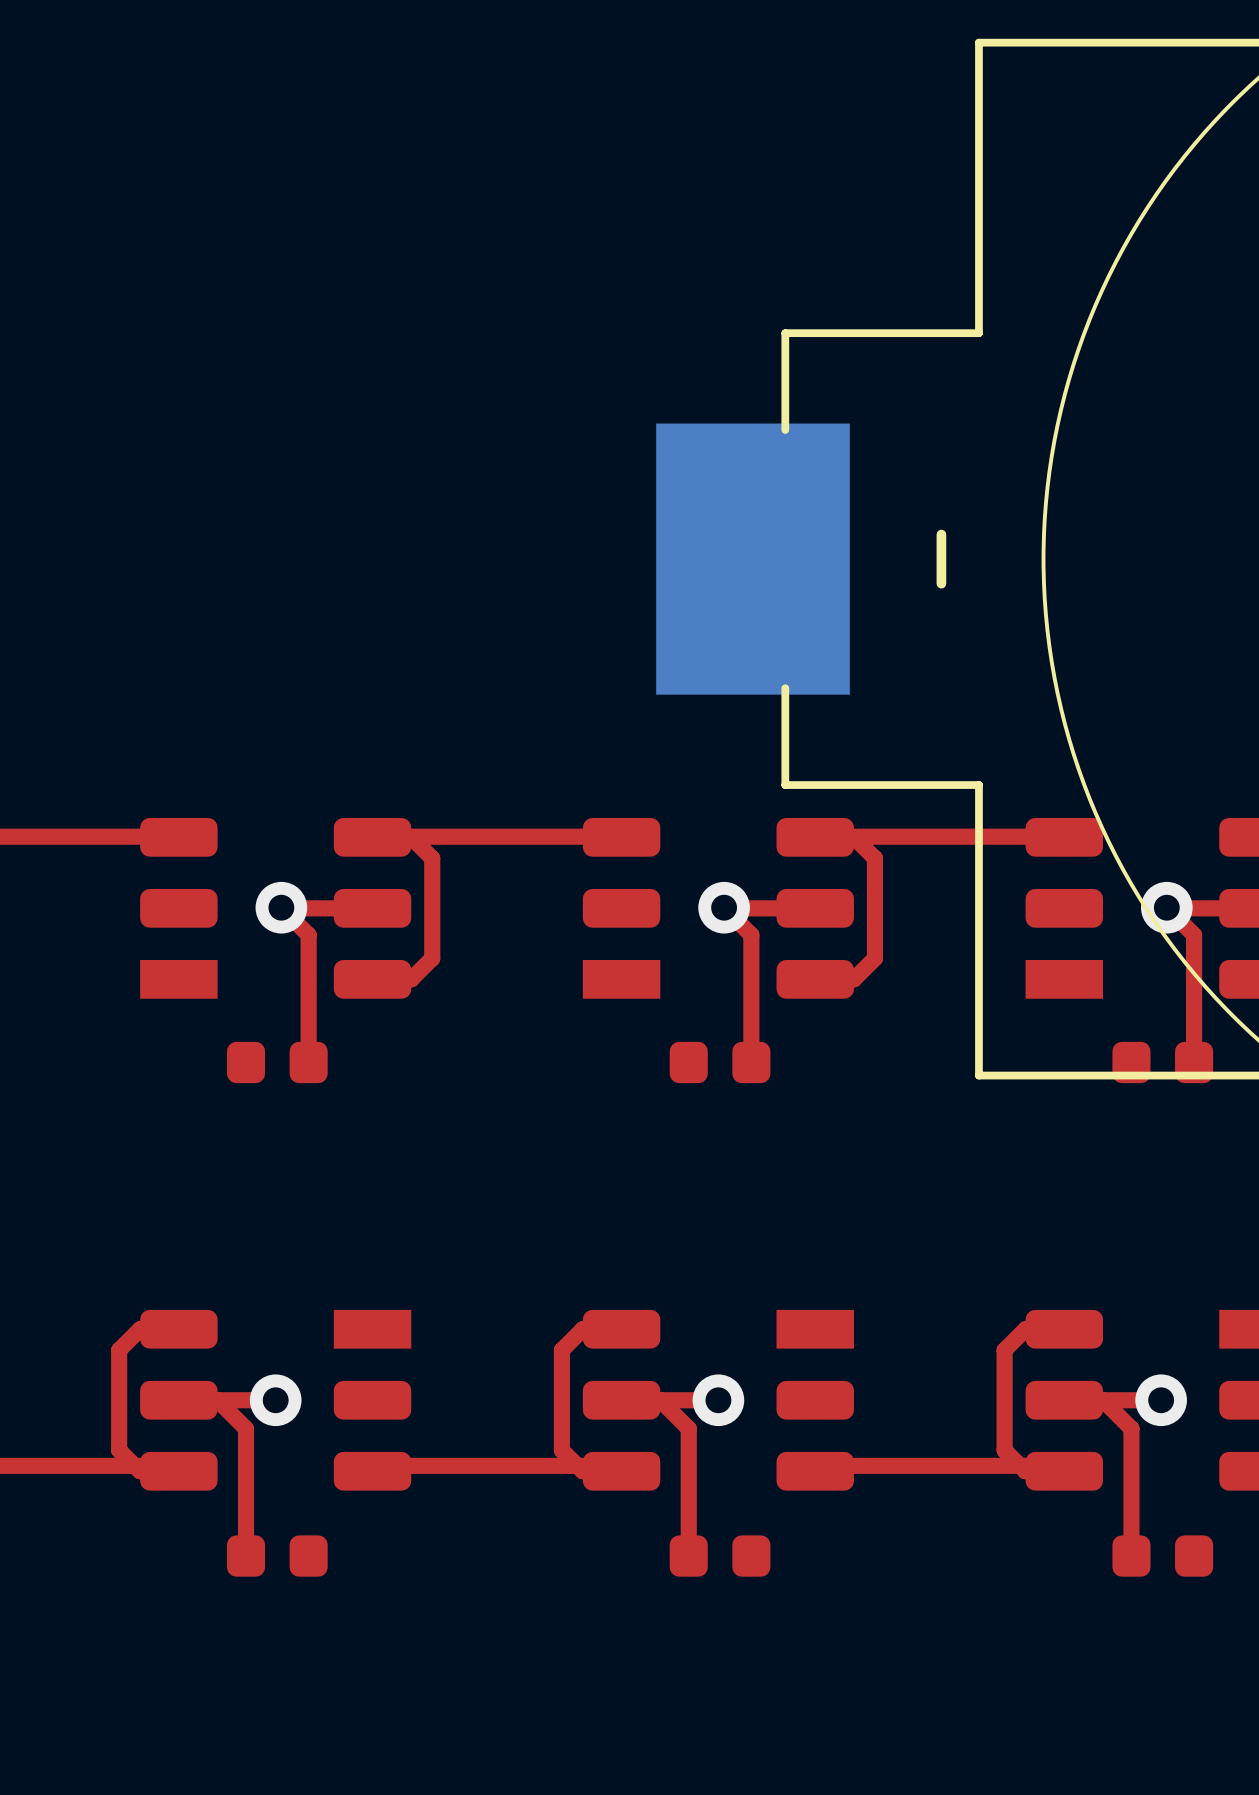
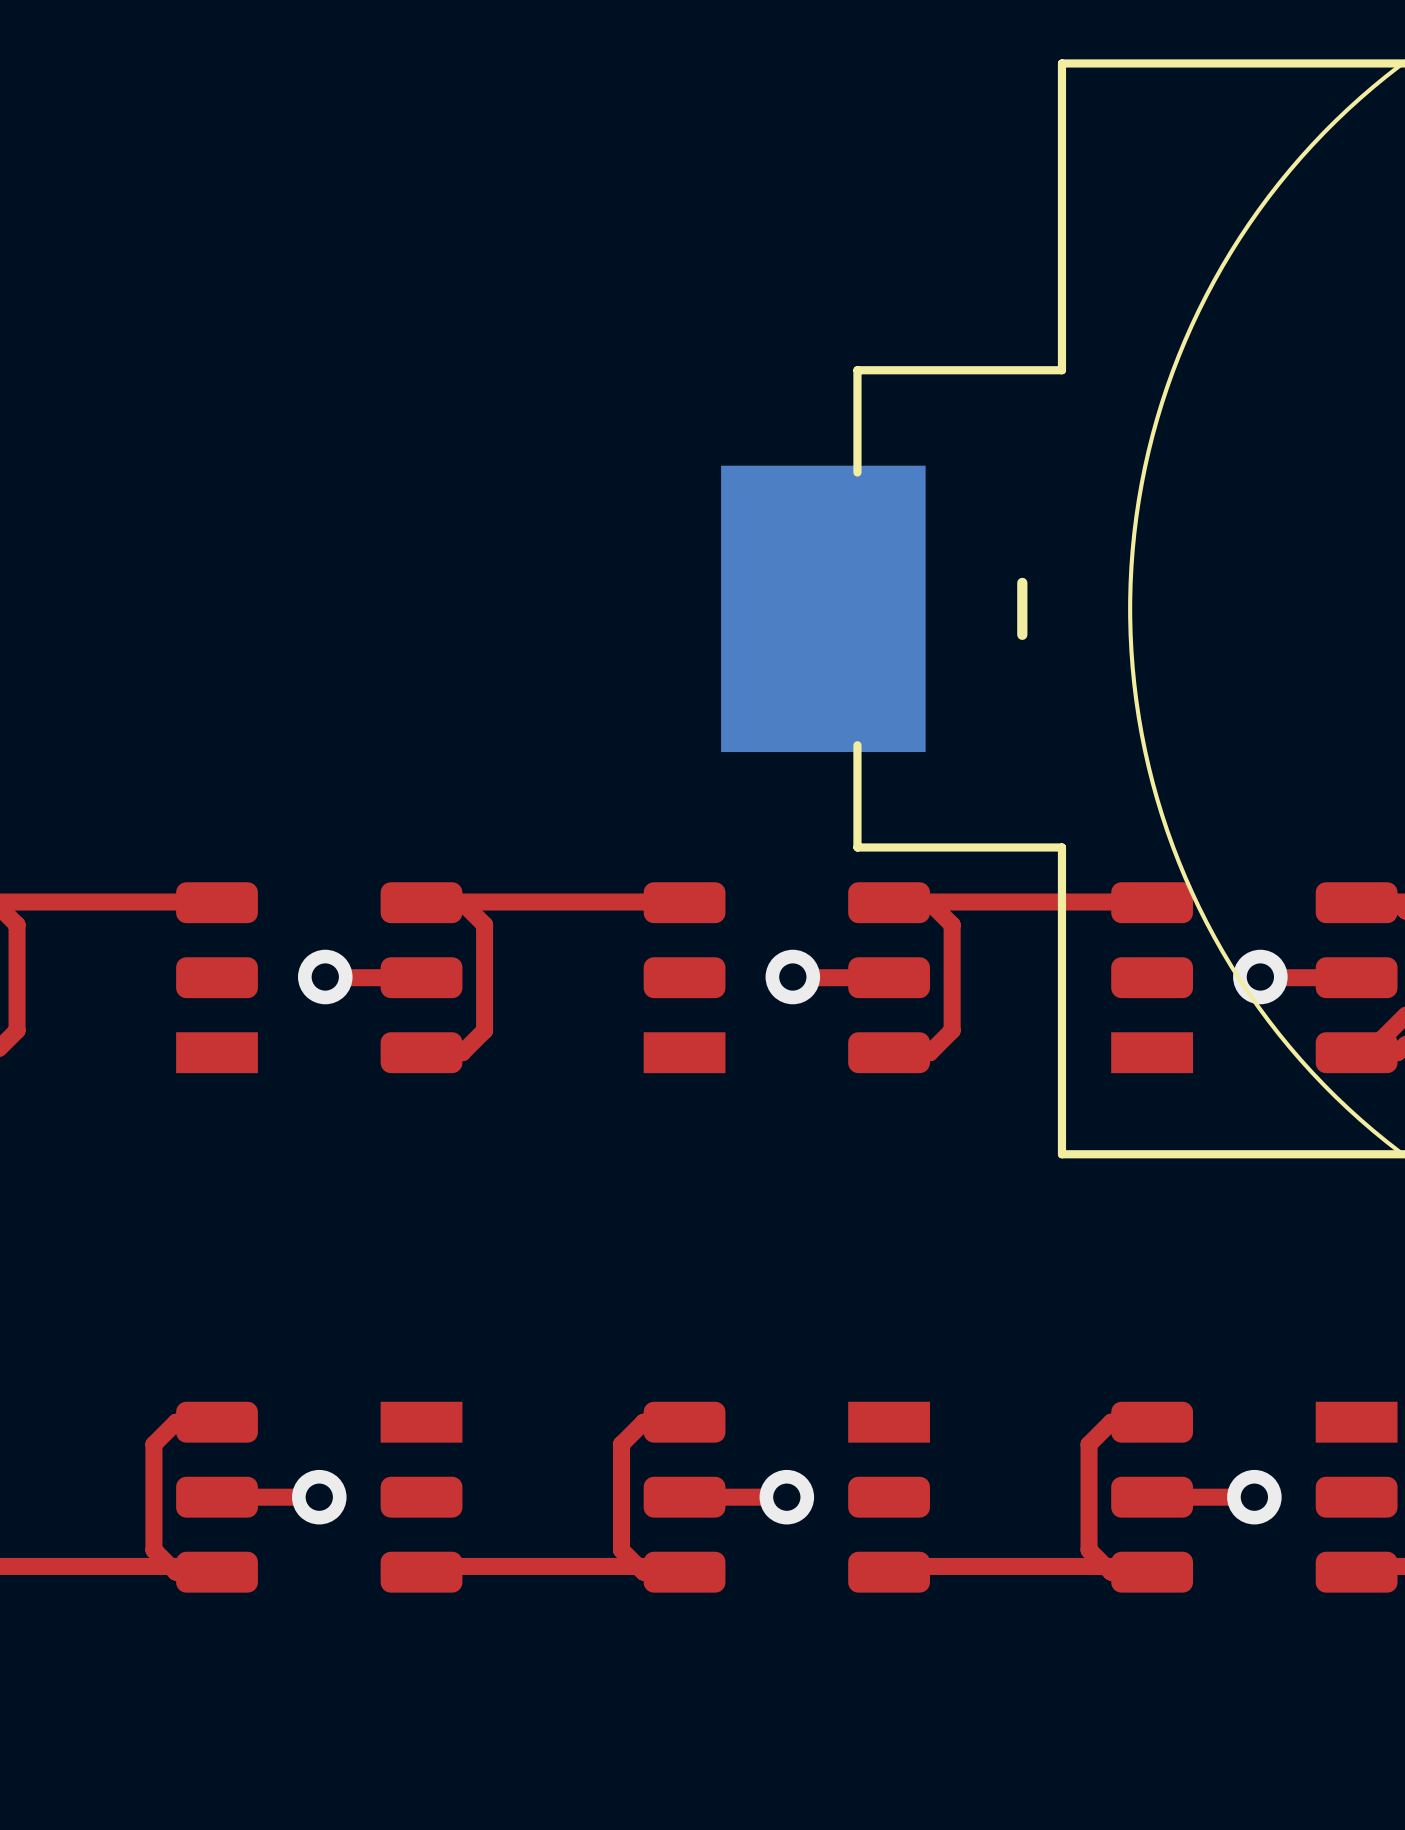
top track: (281, 907) (308, 934) (308, 1062) -> none
top track: (724, 907) (751, 934) (751, 1062) -> none
top track: (1166, 907) (1194, 934) (1194, 1062) -> none
part: (277, 1062) -> none
part: (720, 1062) -> none
part: (1162, 1062) -> none
top track: (217, 1400) (246, 1428) (246, 1556) -> none
top track: (660, 1400) (688, 1428) (688, 1556) -> none
top track: (1103, 1400) (1131, 1428) (1131, 1556) -> none
part: (277, 1556) -> none
part: (720, 1556) -> none
part: (1162, 1556) -> none

